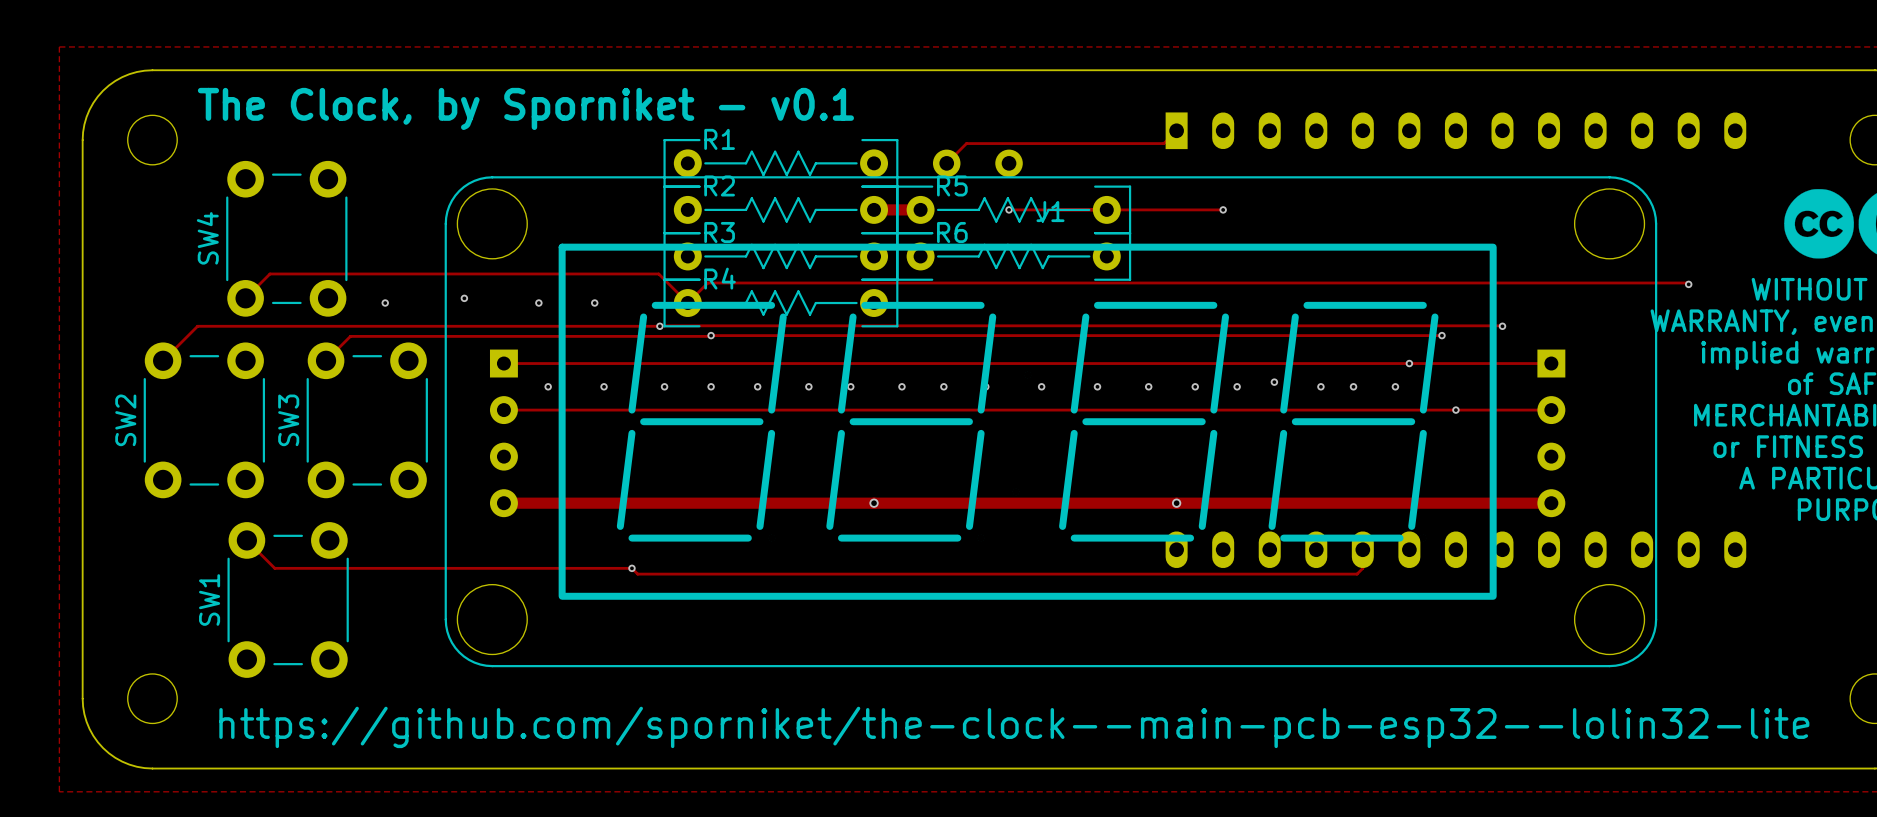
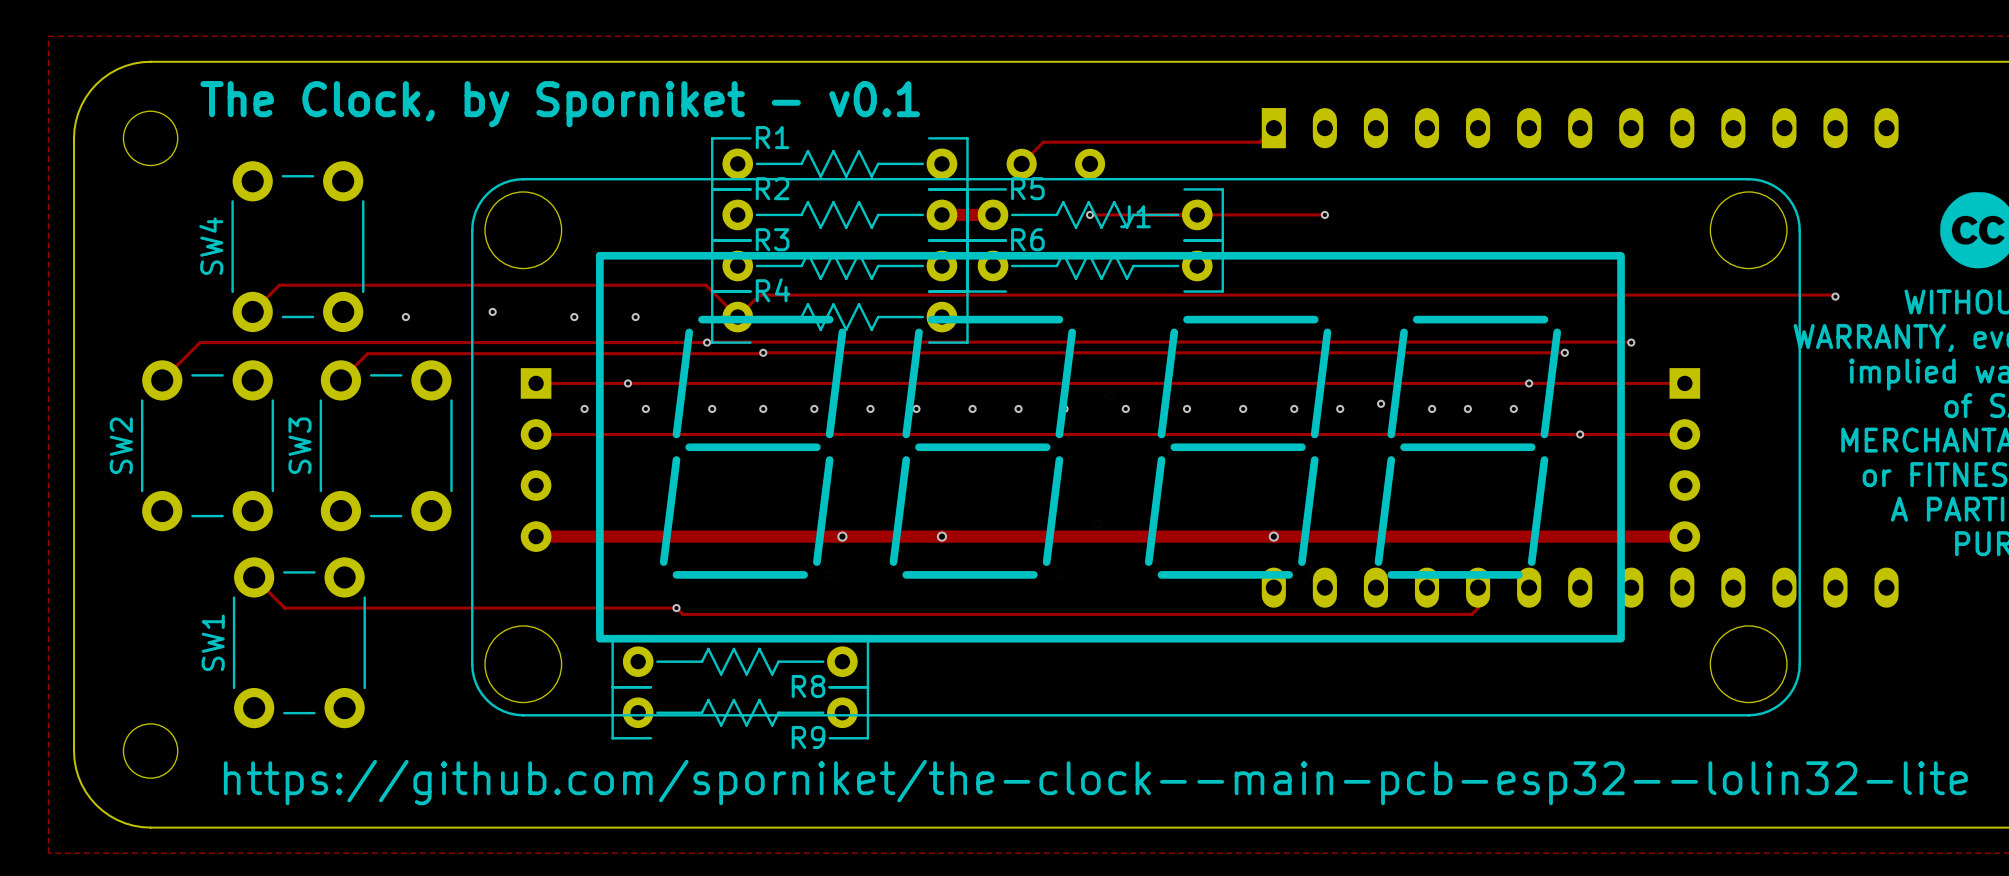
via: none -> (627, 383)
via: none -> (842, 536)
R8: none -> (740, 661)
R9: none -> (740, 712)

